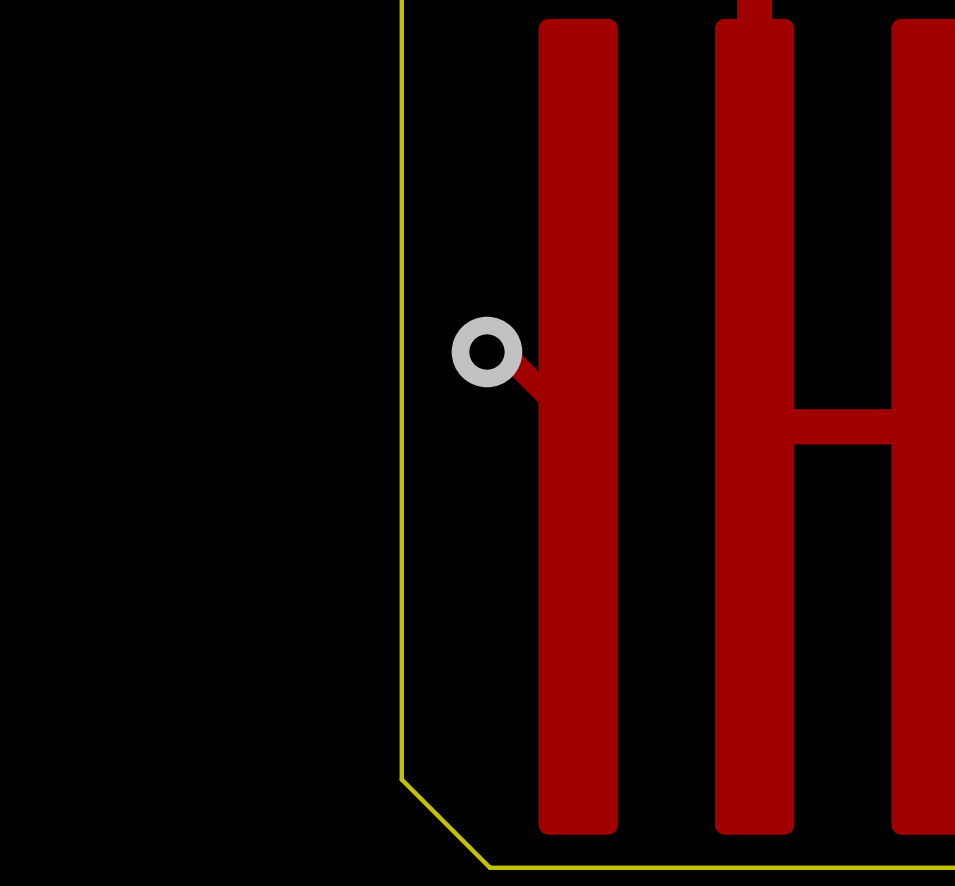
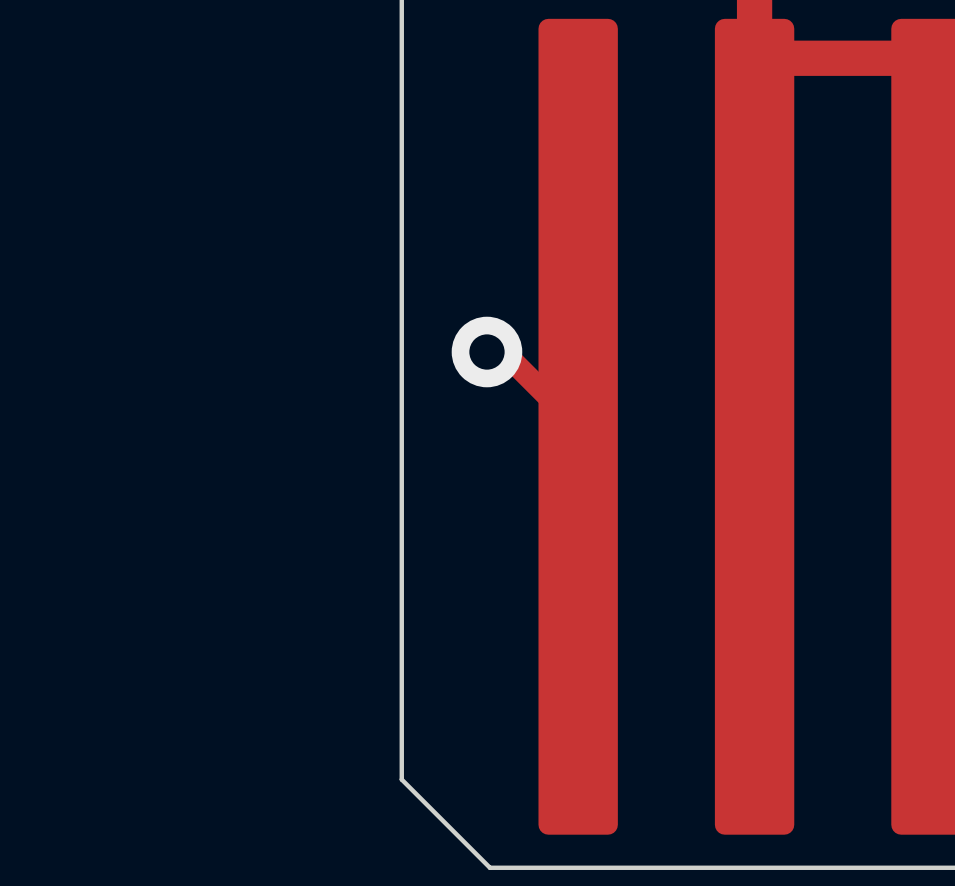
track: (754, 426) (930, 426) -> (754, 58) (930, 58)

